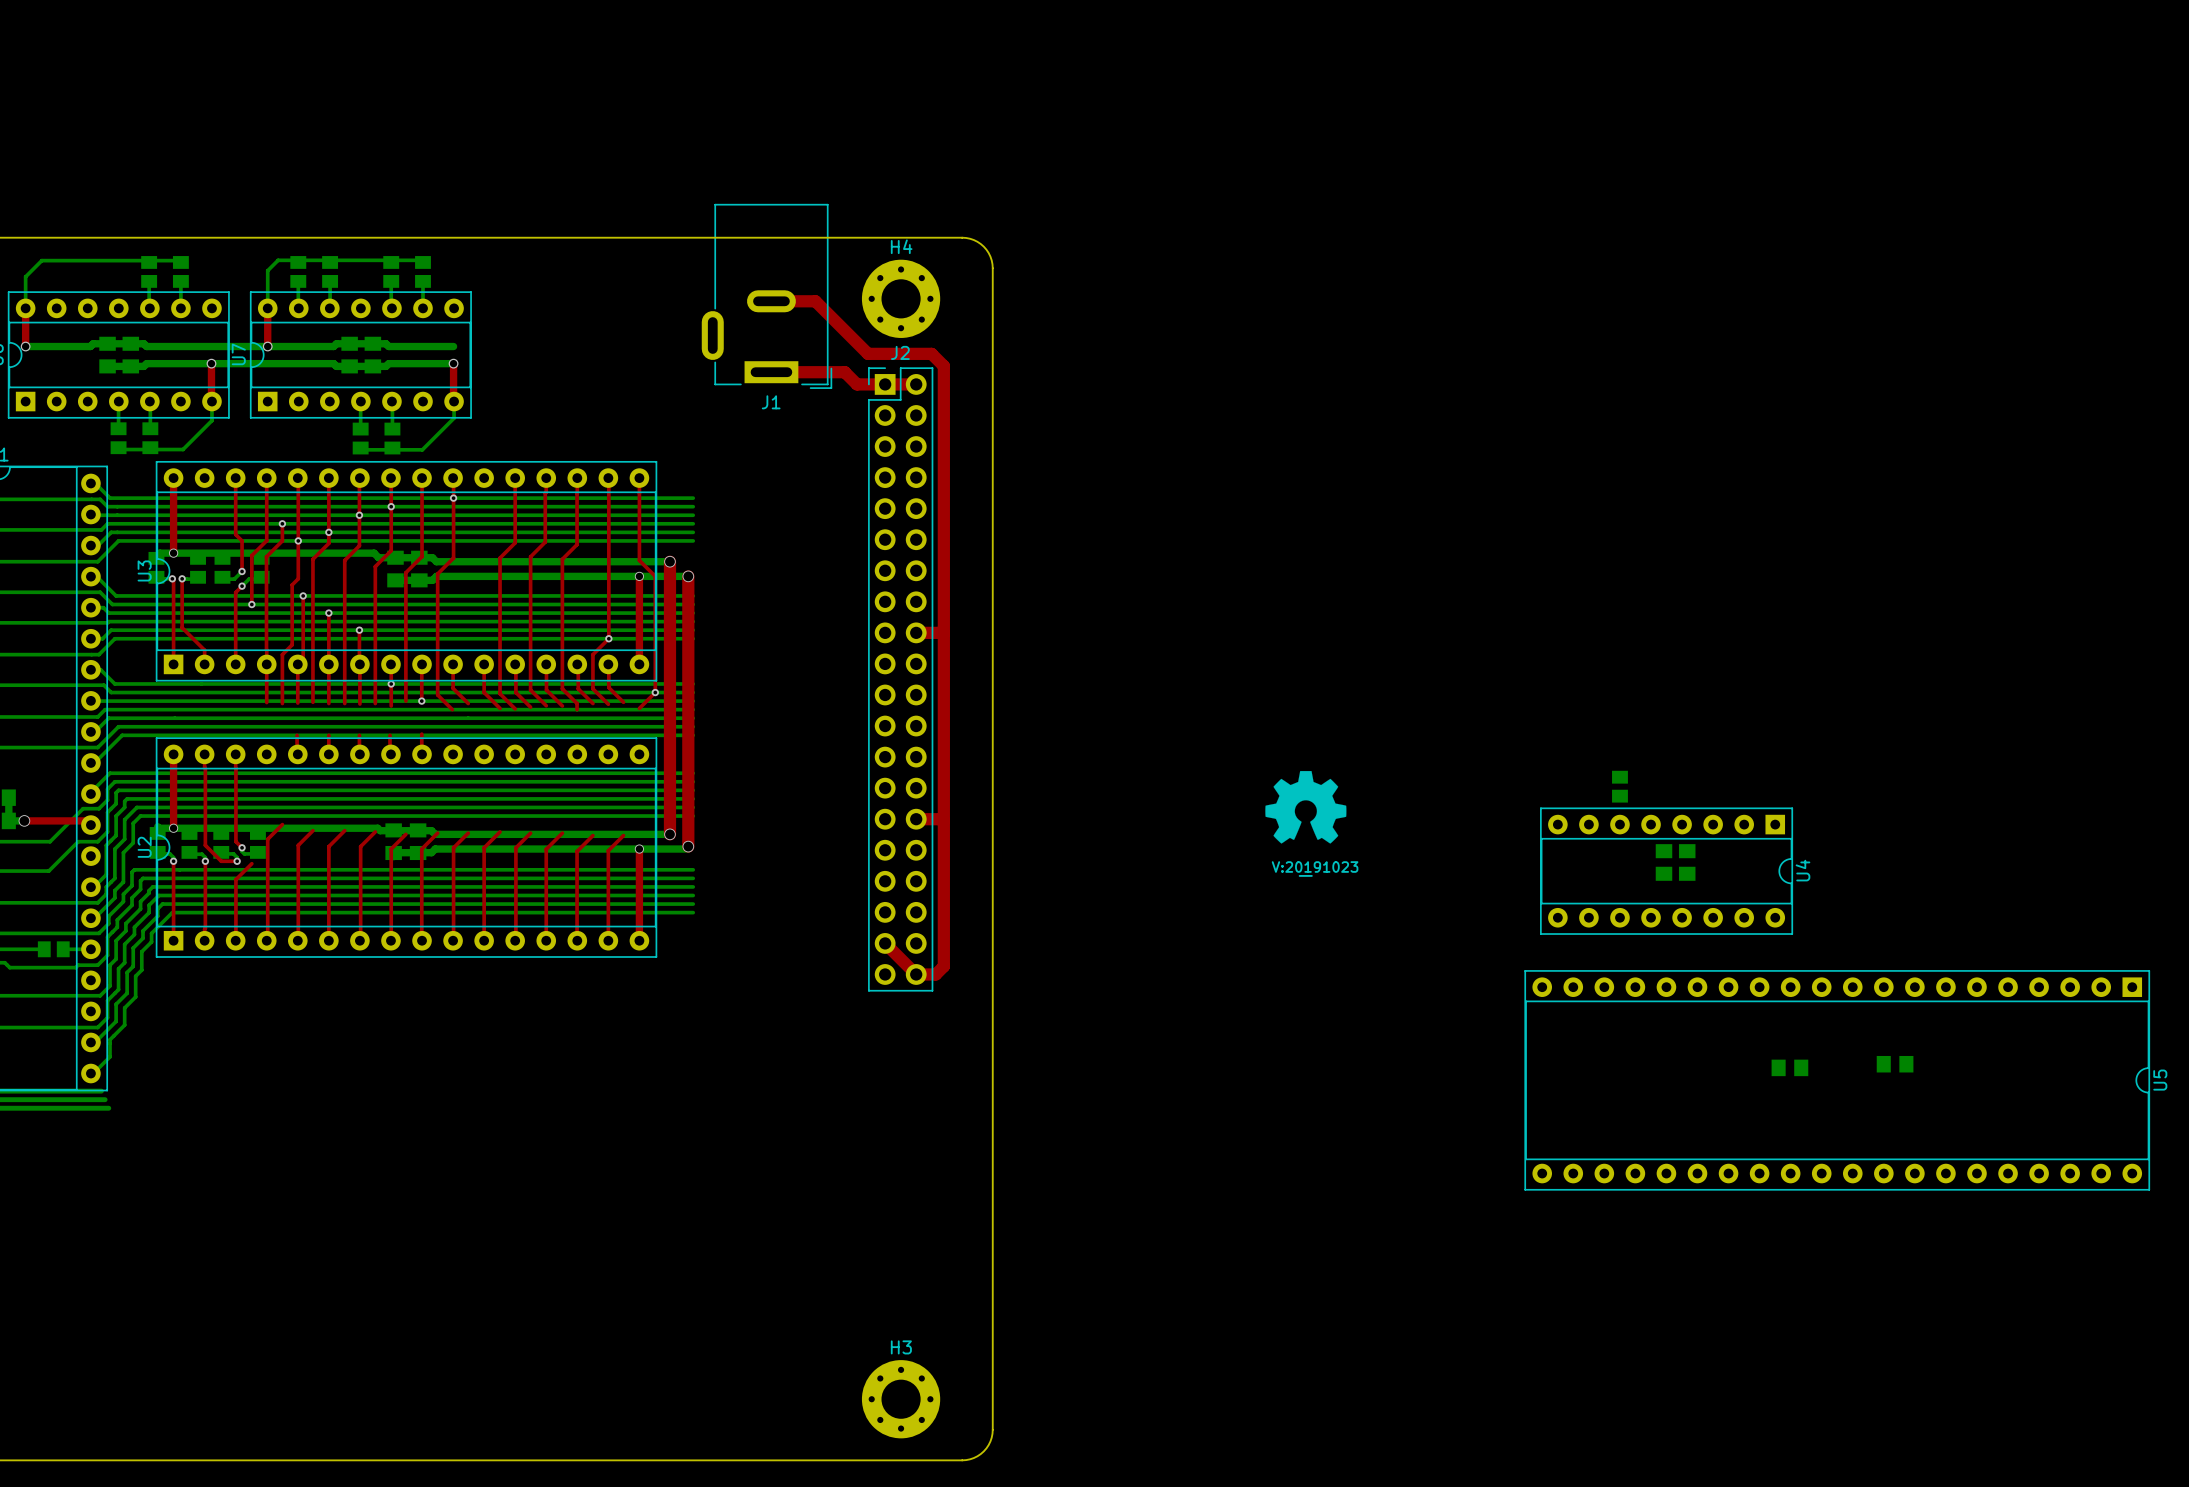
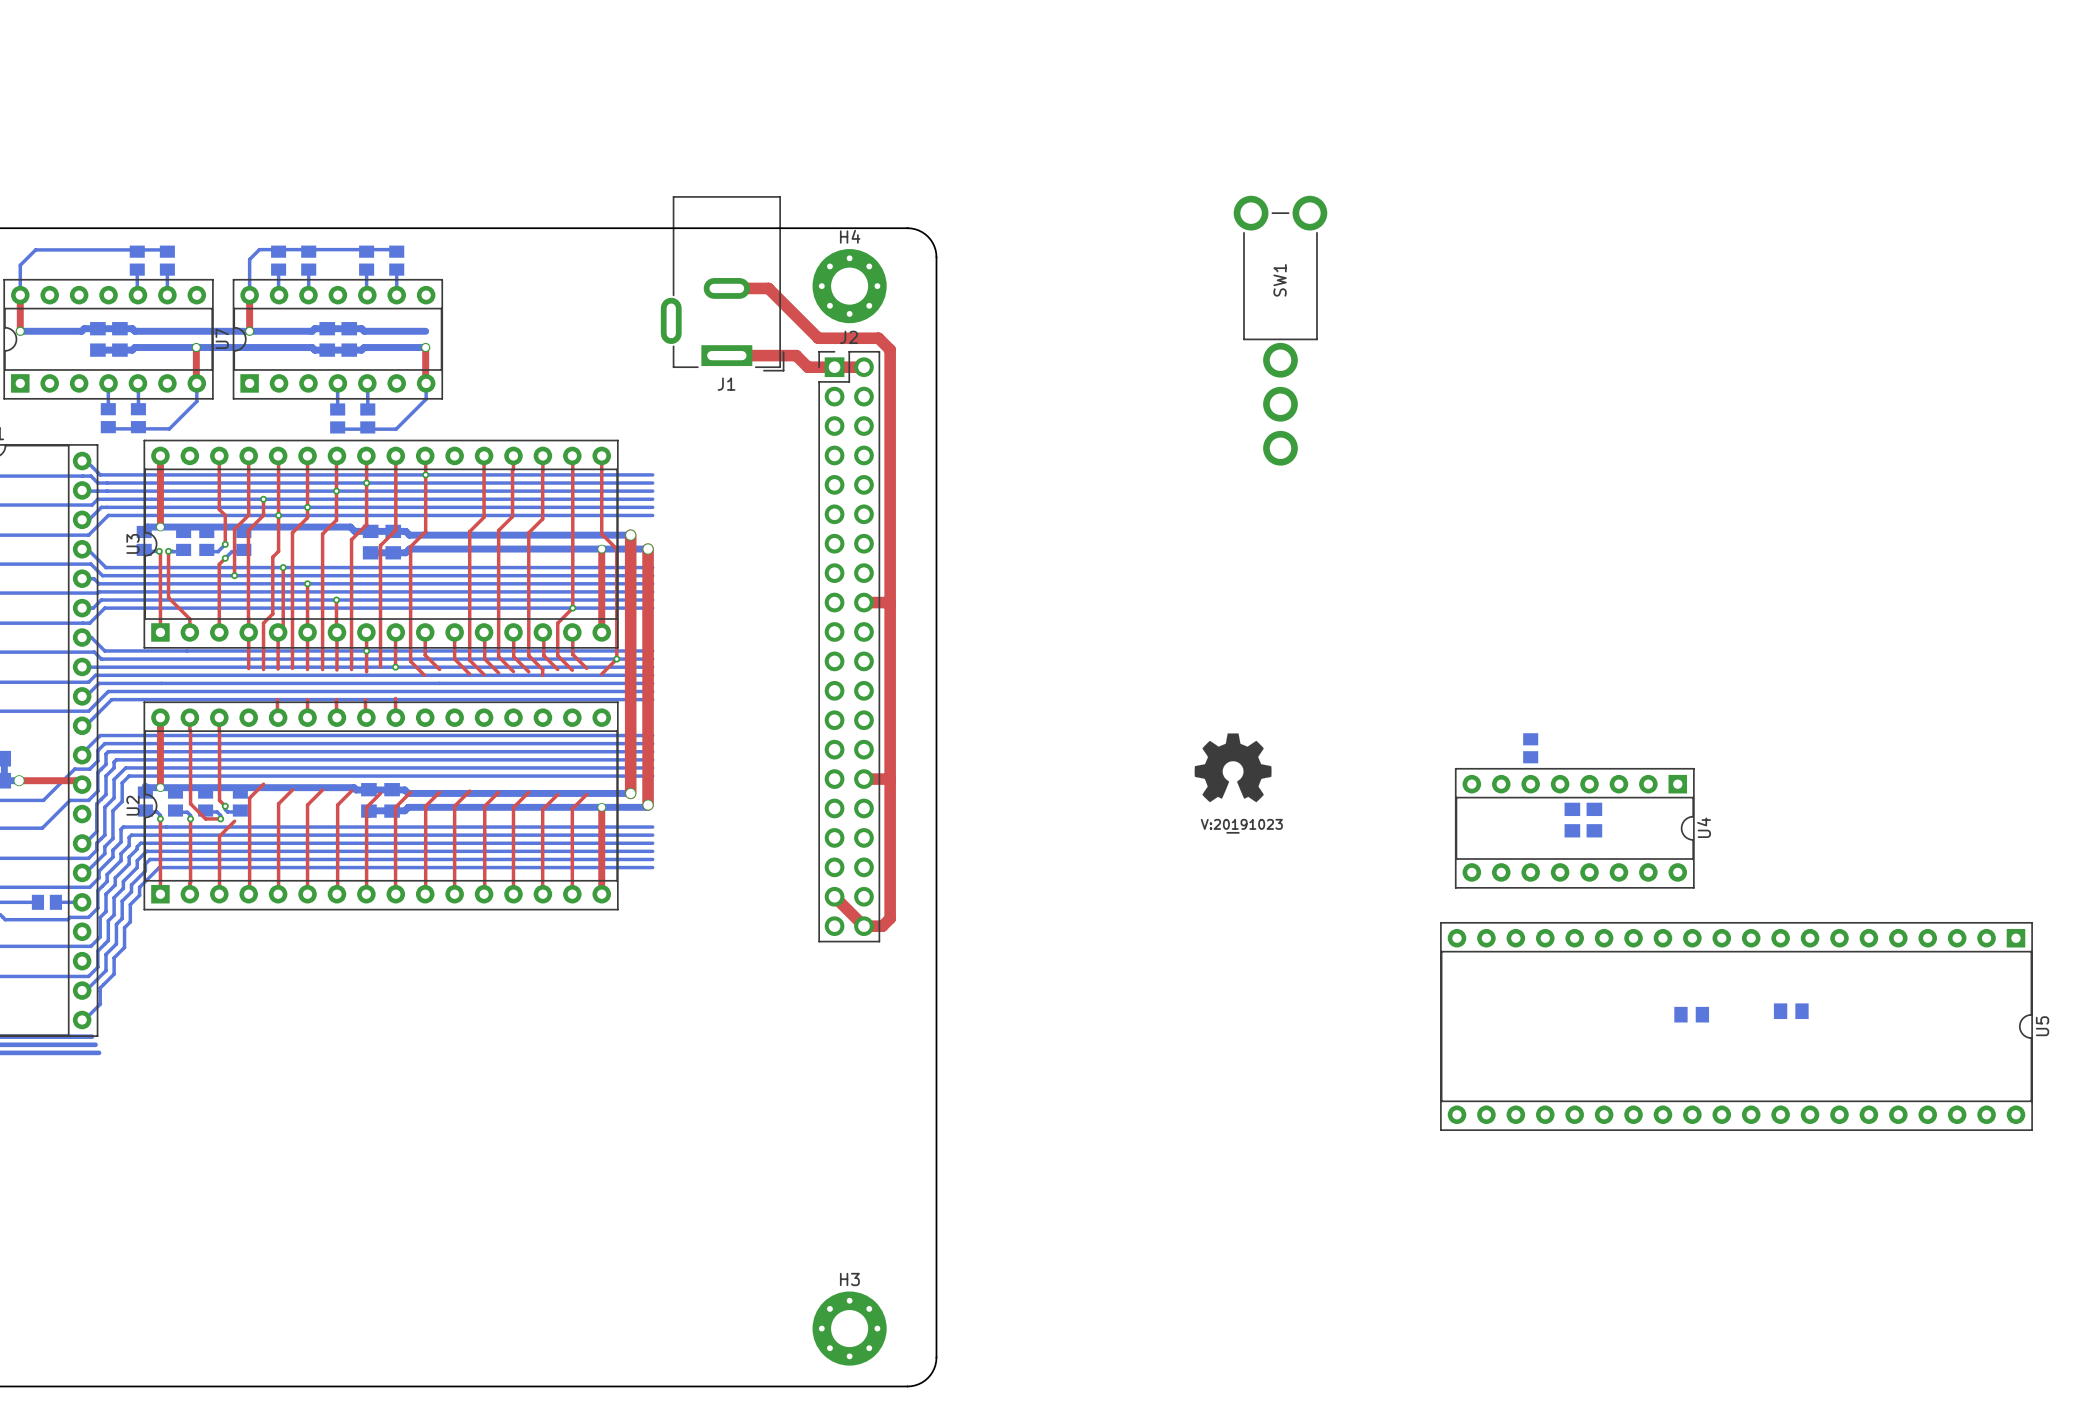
SW1: none -> (1280, 330)

